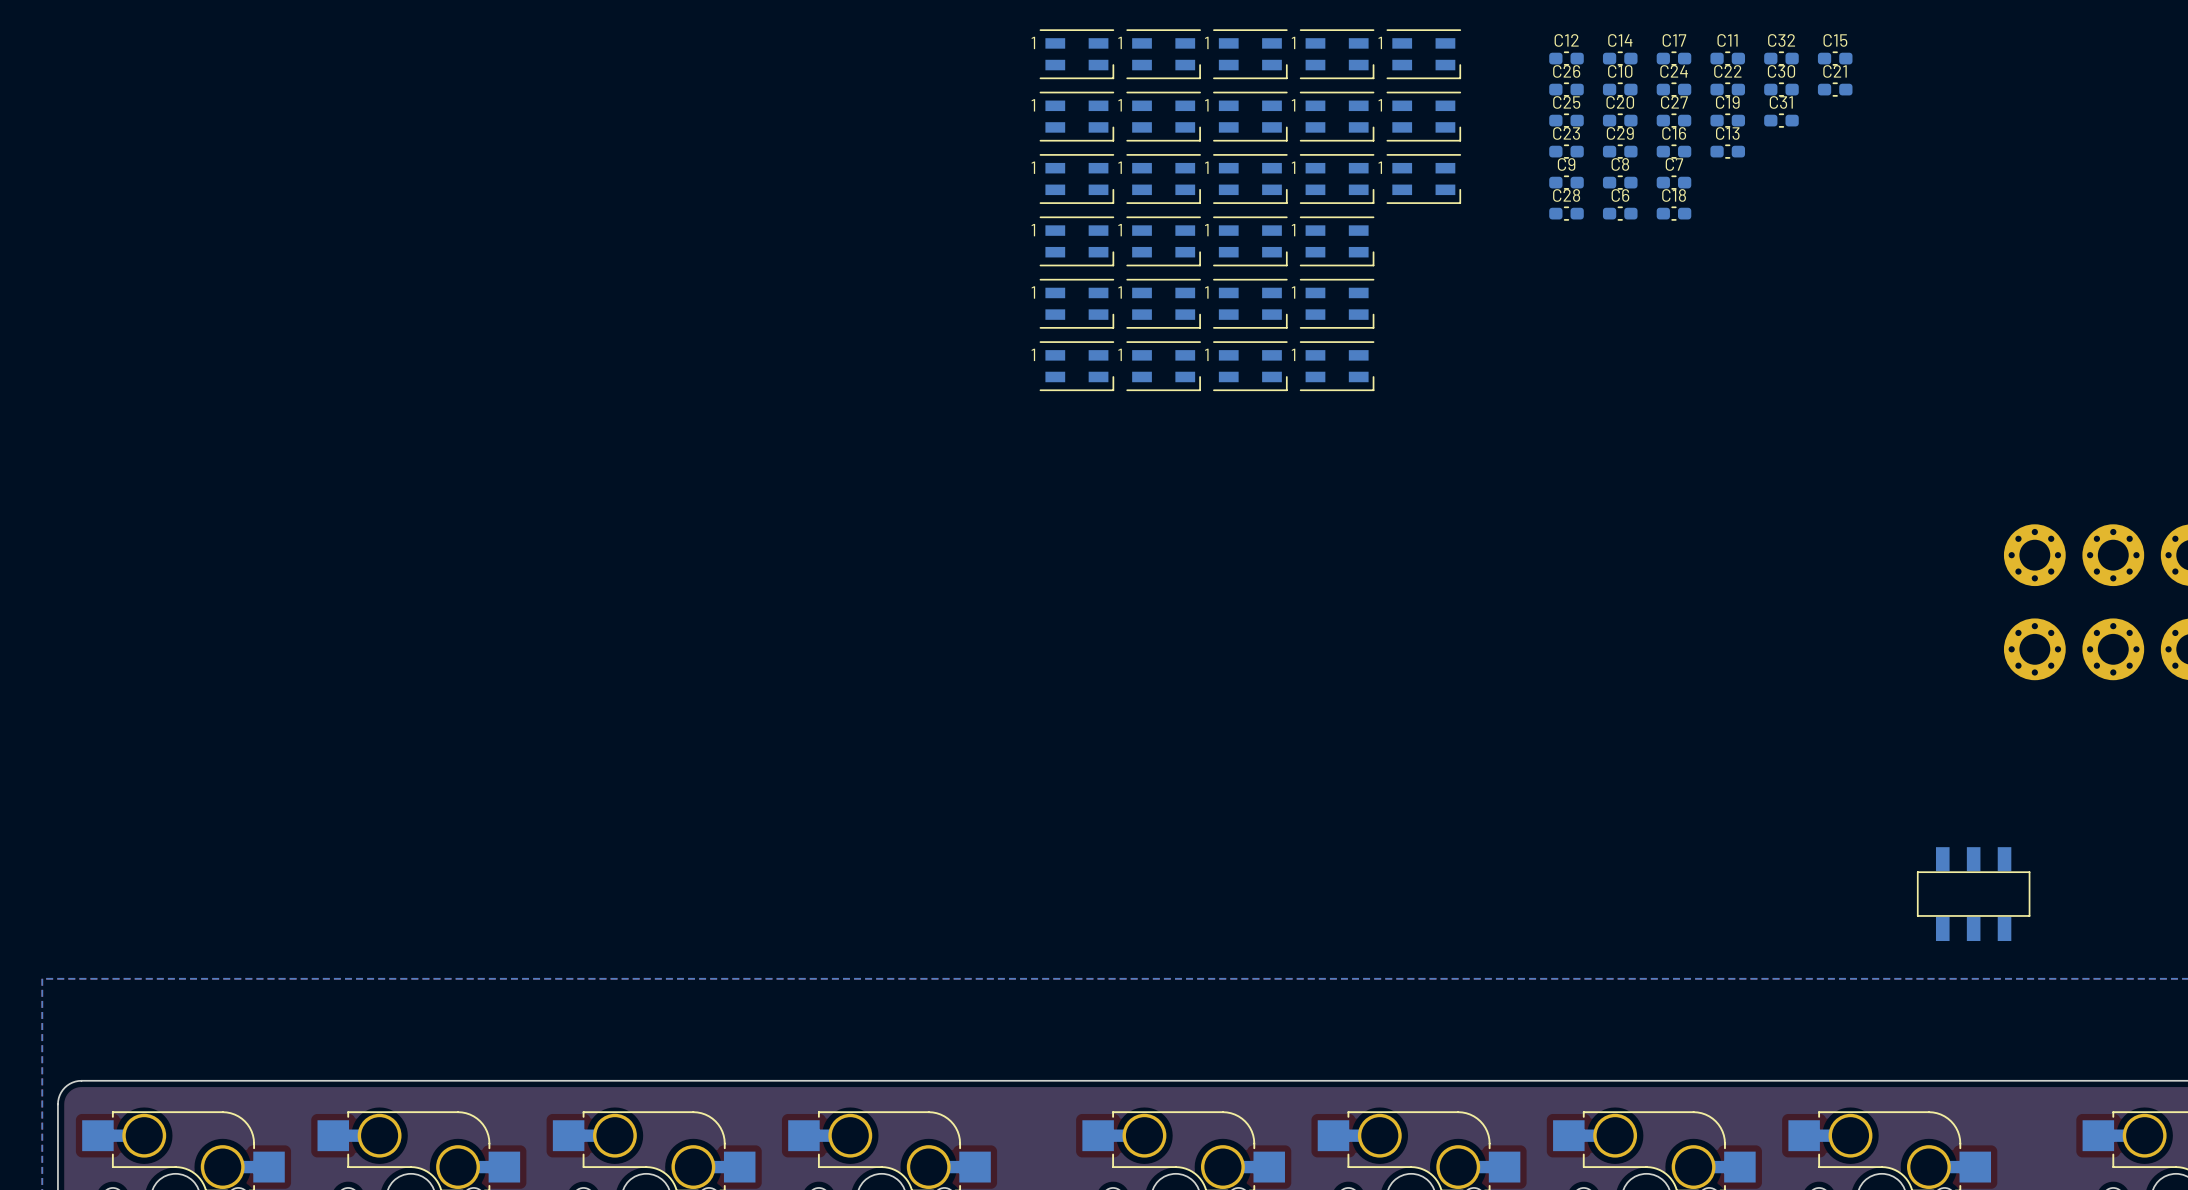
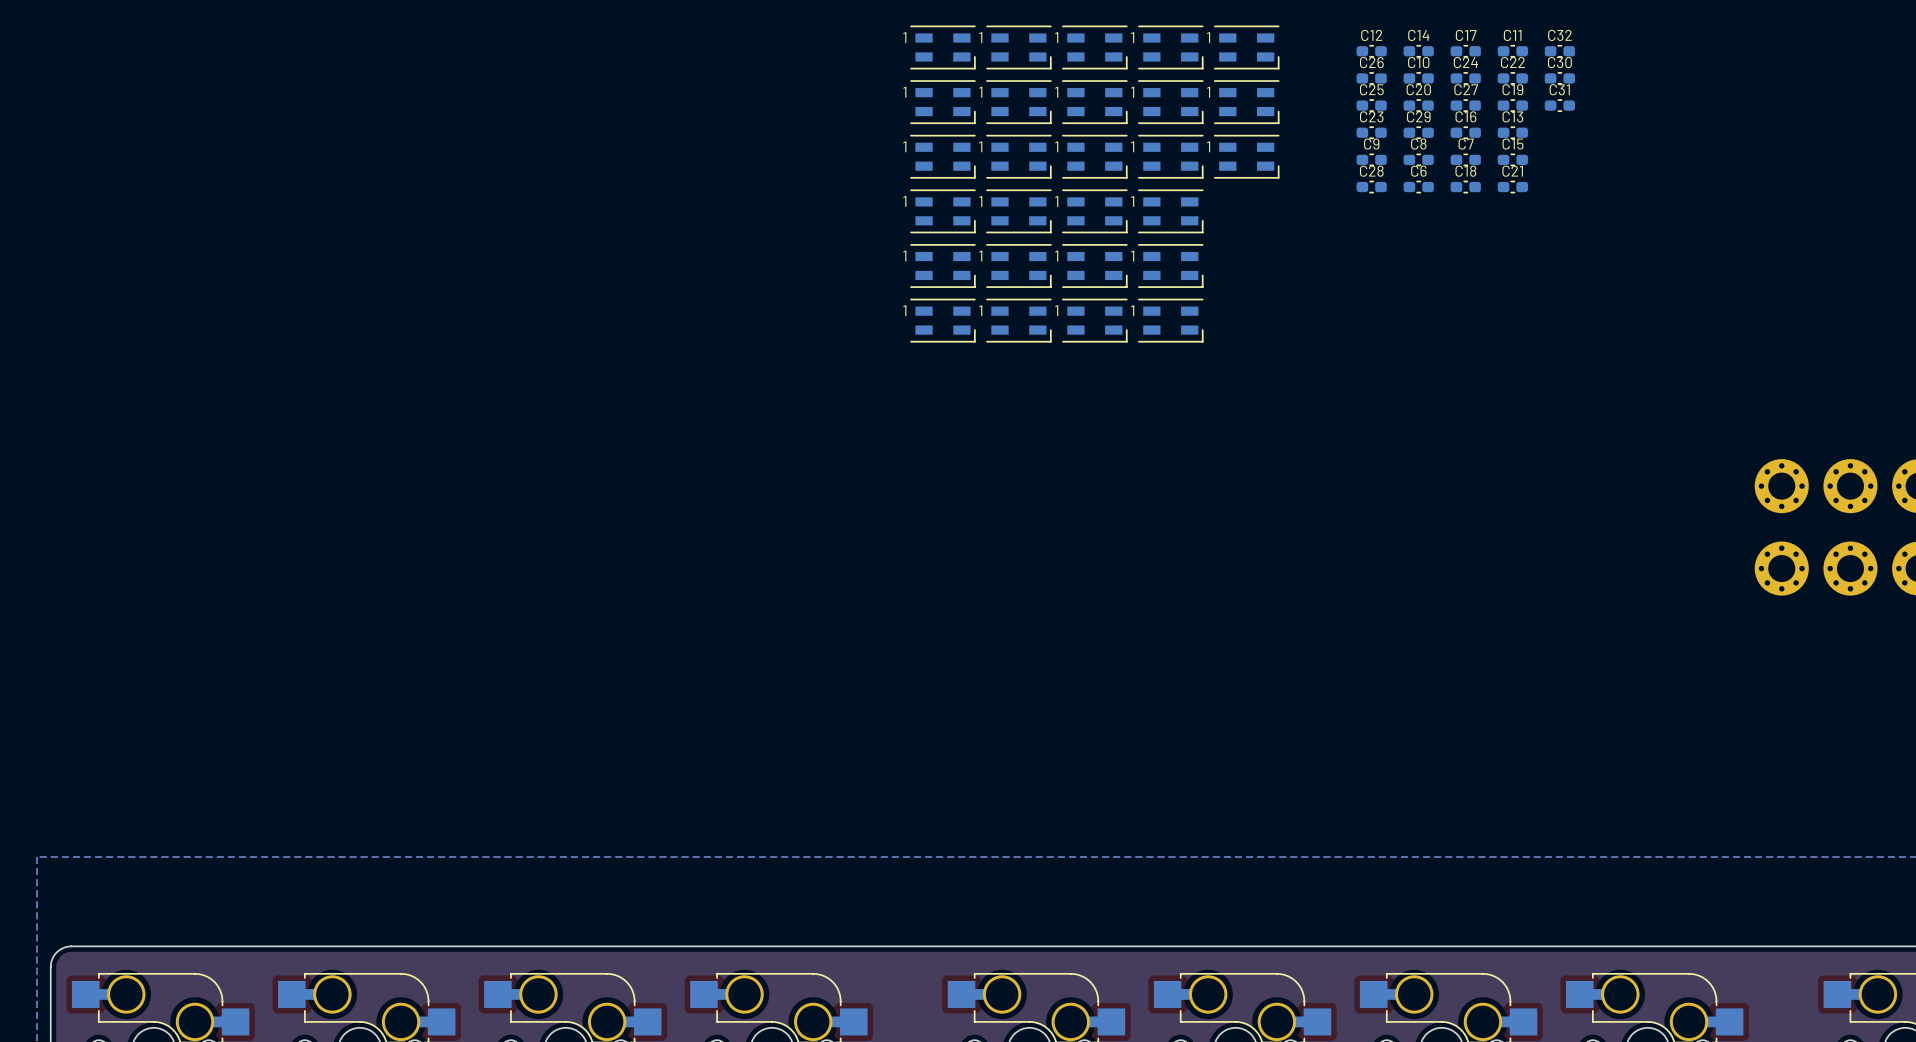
C15 position: (1835, 58) -> (1512, 159)
C21 position: (1835, 89) -> (1512, 187)
part: (1973, 894) -> none

